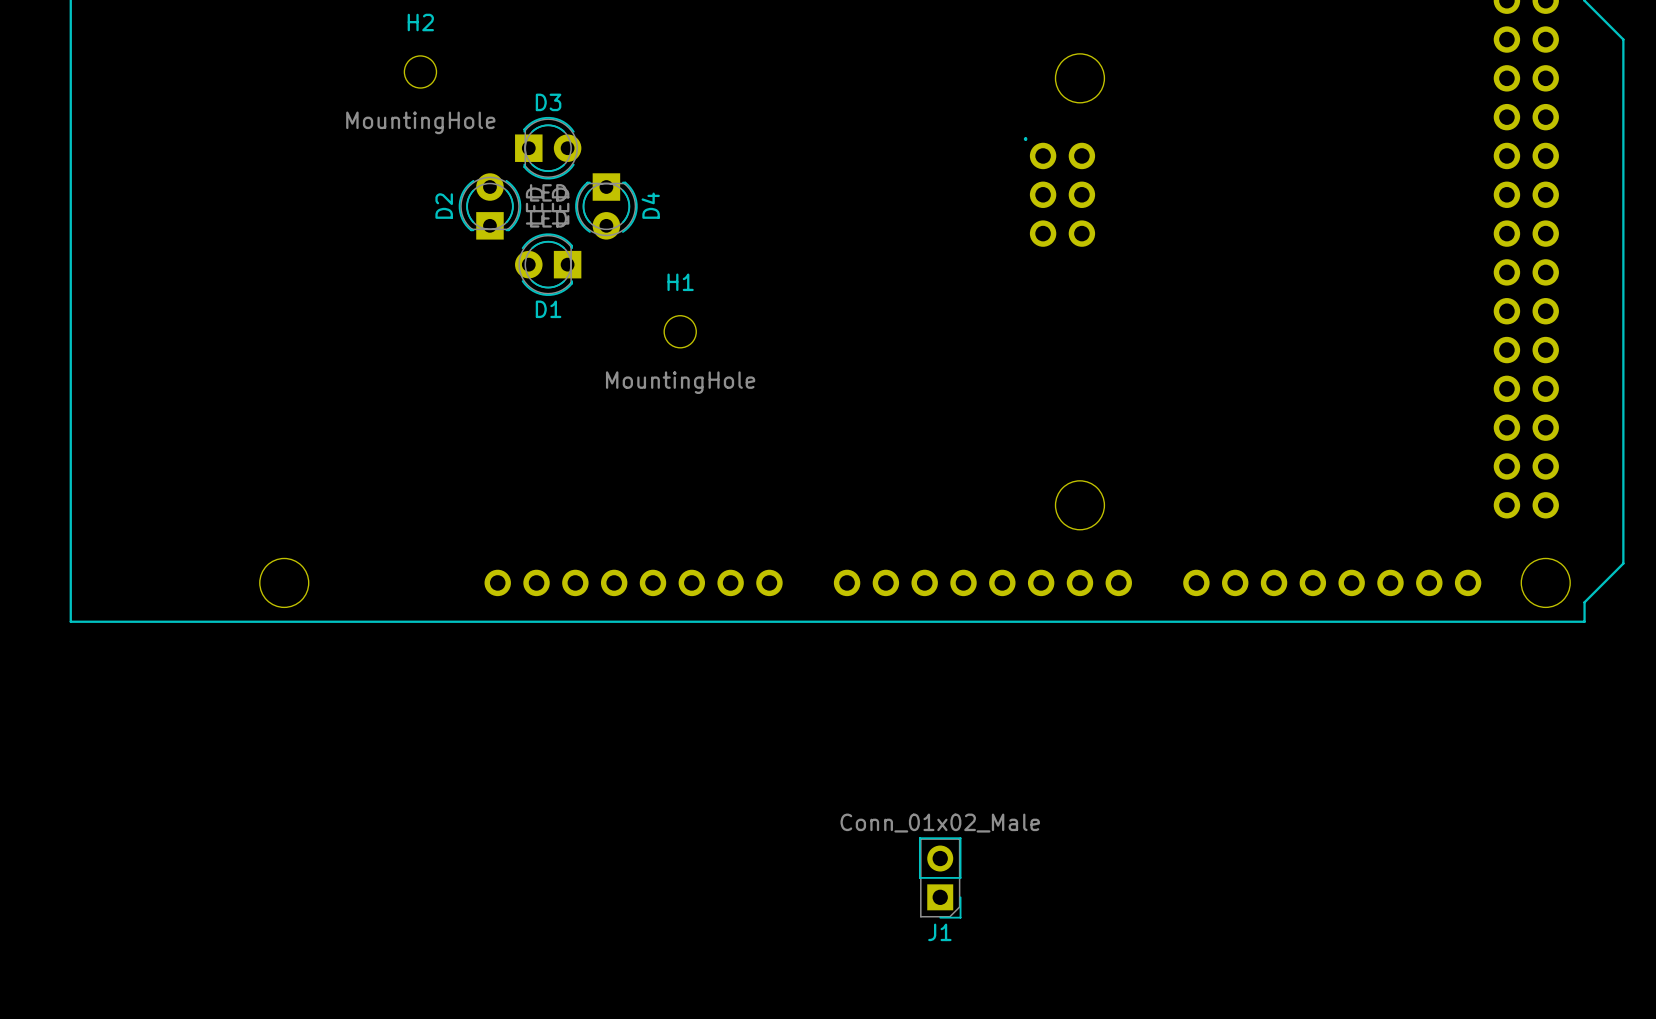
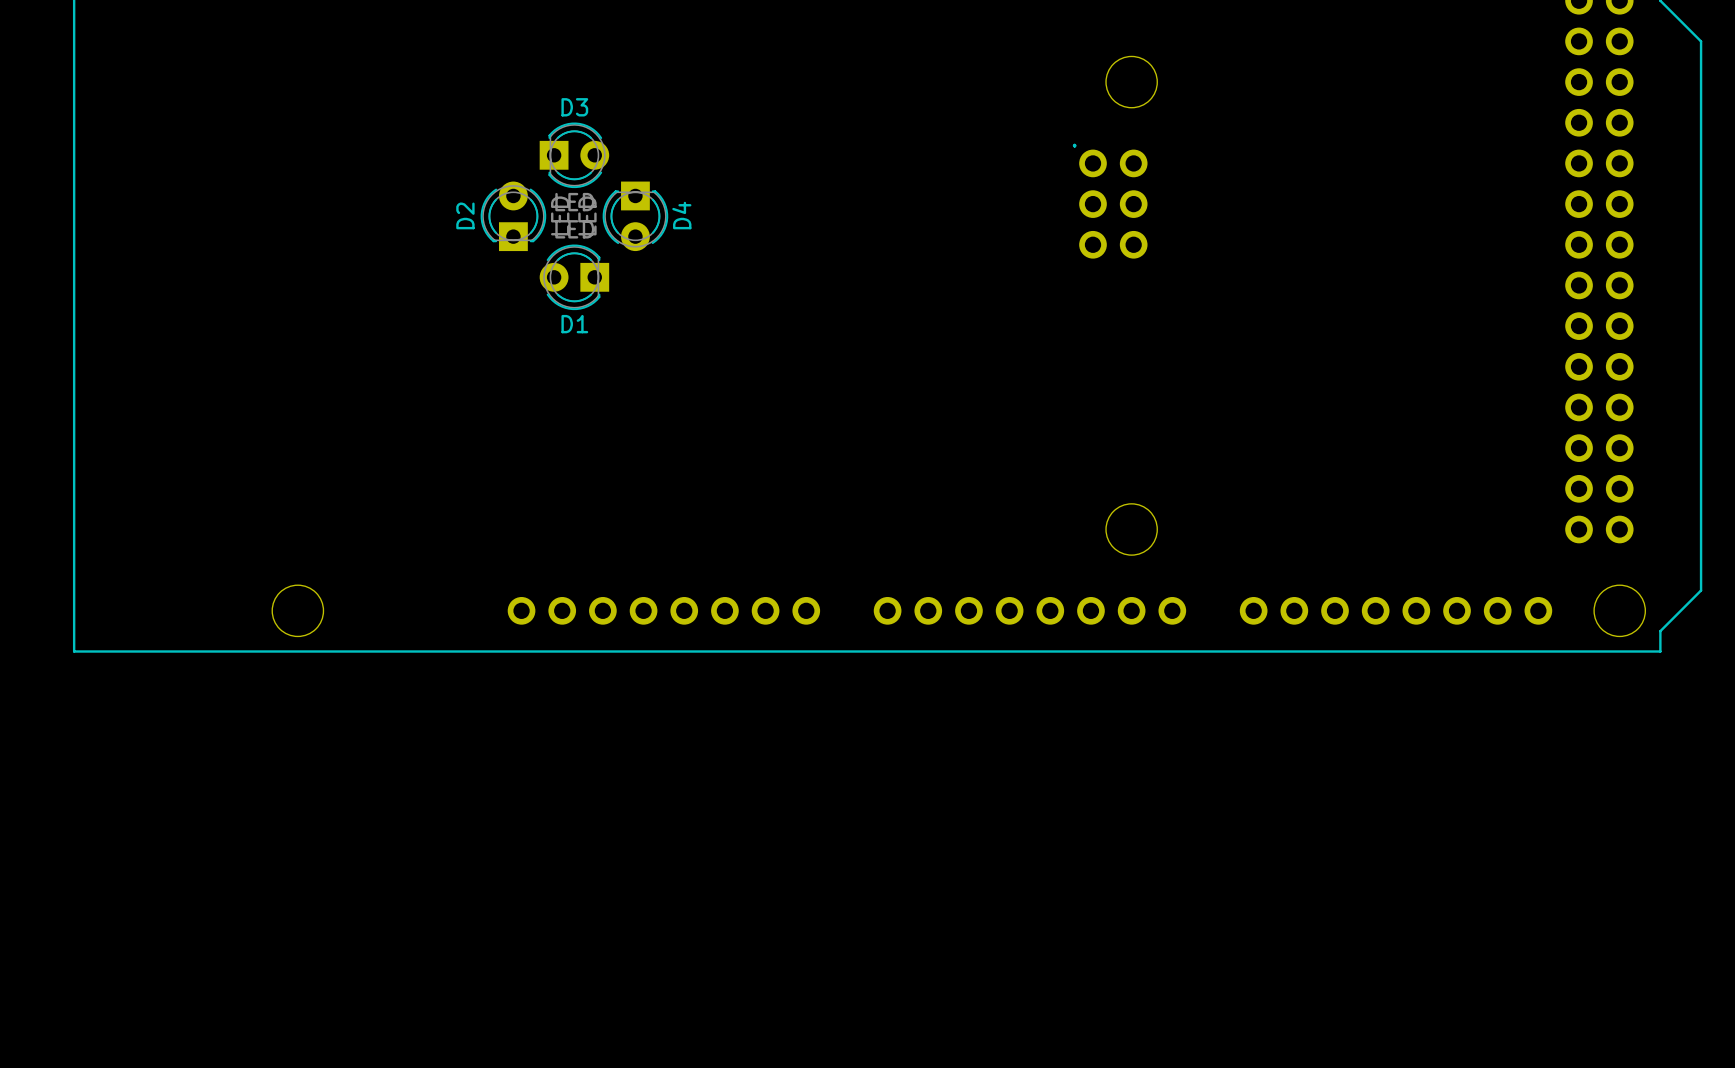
H2: MountingHole (420, 71) -> none
H1: MountingHole (680, 331) -> none
J1: Conn_01x02_Male (940, 877) -> none

